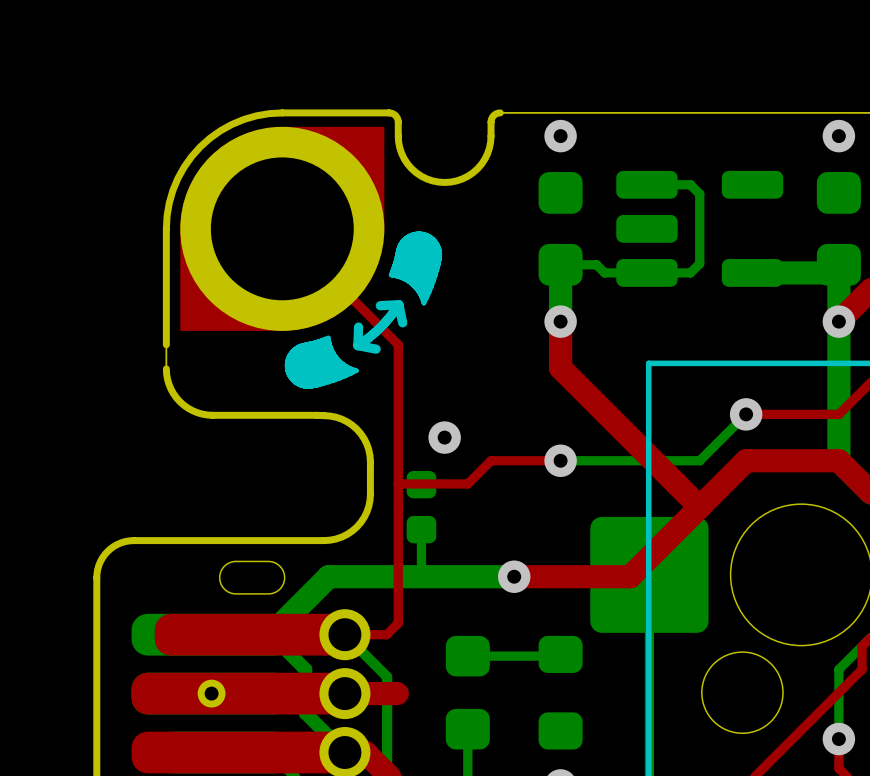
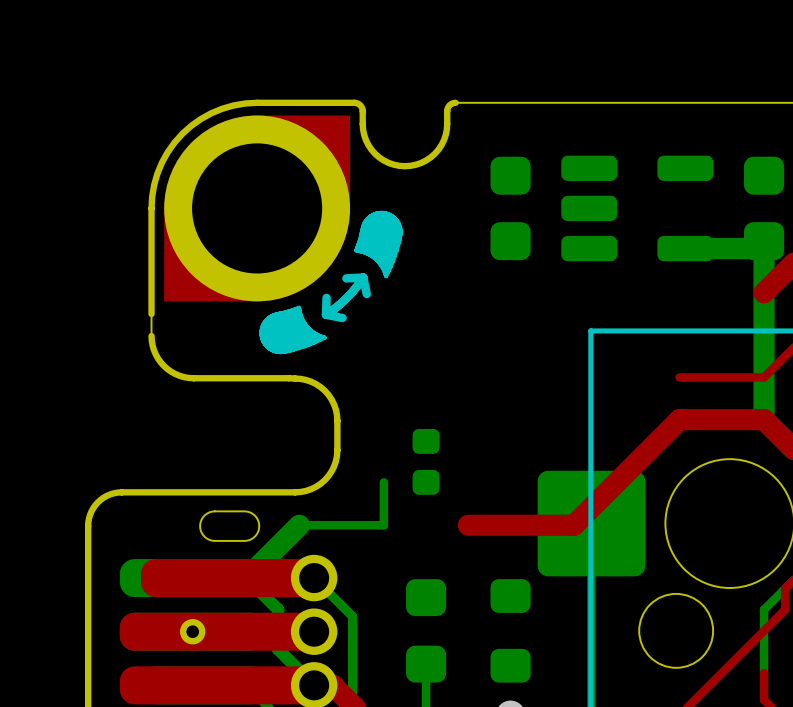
via: (560, 136) -> none
via: (838, 136) -> none
bottom track: (646, 184) (690, 184) (699, 194) (699, 263) (690, 272) (604, 272) (596, 264) (560, 264) (560, 321) -> none
top track: (282, 228) (398, 344) (398, 623) (386, 634) (344, 634) -> none
top track: (560, 321) (560, 368) (699, 507) -> none
via: (560, 321) -> none
via: (838, 321) -> none
bottom track: (746, 414) (699, 460) (560, 460) -> none
via: (746, 414) -> none
via: (444, 437) -> none
top track: (560, 460) (491, 460) (467, 483) (398, 483) -> none
via: (560, 460) -> none
part position: (421, 507) -> (426, 461)
bottom track: (328, 576) (514, 576) -> none
via: (514, 576) -> none
bottom track: (560, 654) (558, 656) (467, 656) -> none
top track: (344, 693) (397, 693) -> none
via: (838, 739) -> none

